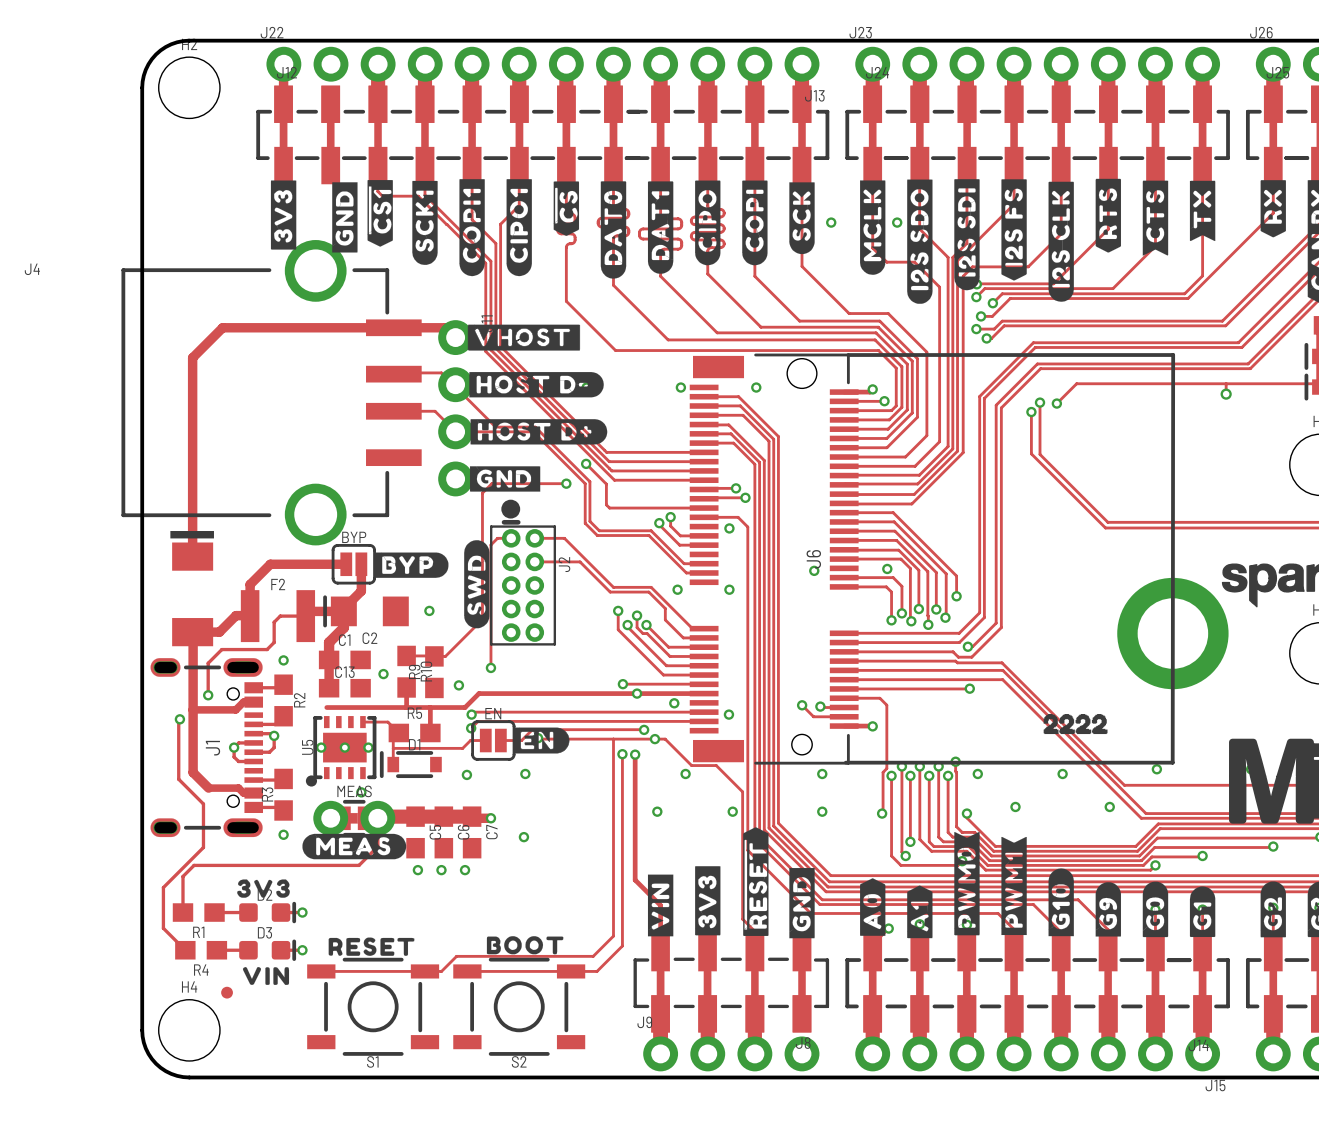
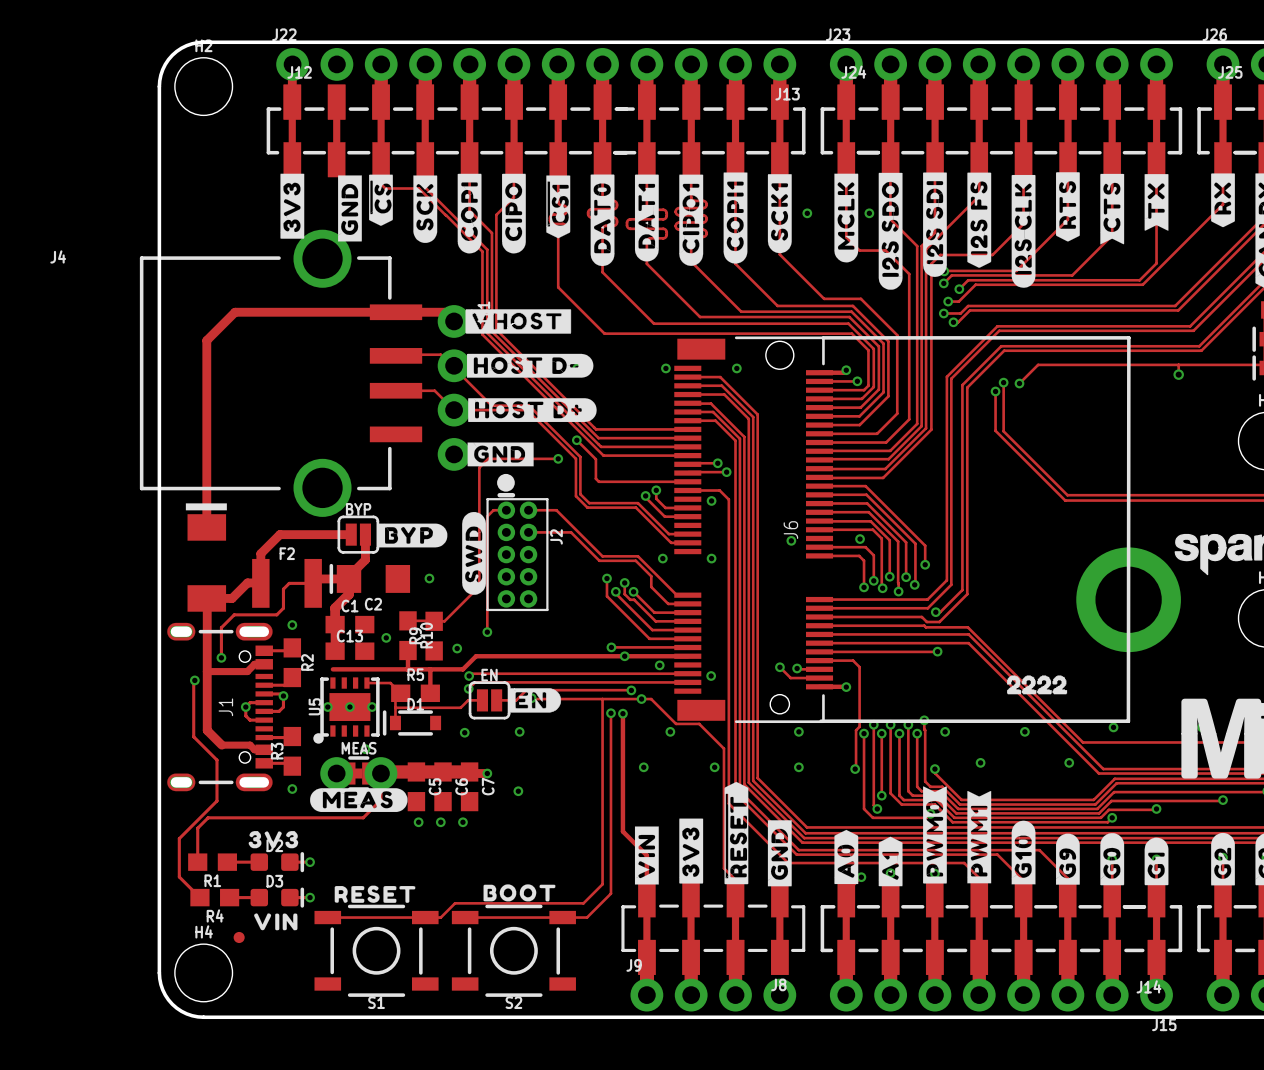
drawing position: (566, 208) -> (380, 200)
drawing position: (380, 213) -> (558, 206)
drawing position: (802, 218) -> (425, 209)
drawing position: (424, 222) -> (779, 213)
drawing position: (707, 222) -> (513, 213)
drawing position: (754, 222) -> (469, 213)
drawing position: (472, 227) -> (735, 218)
drawing position: (519, 227) -> (691, 220)

